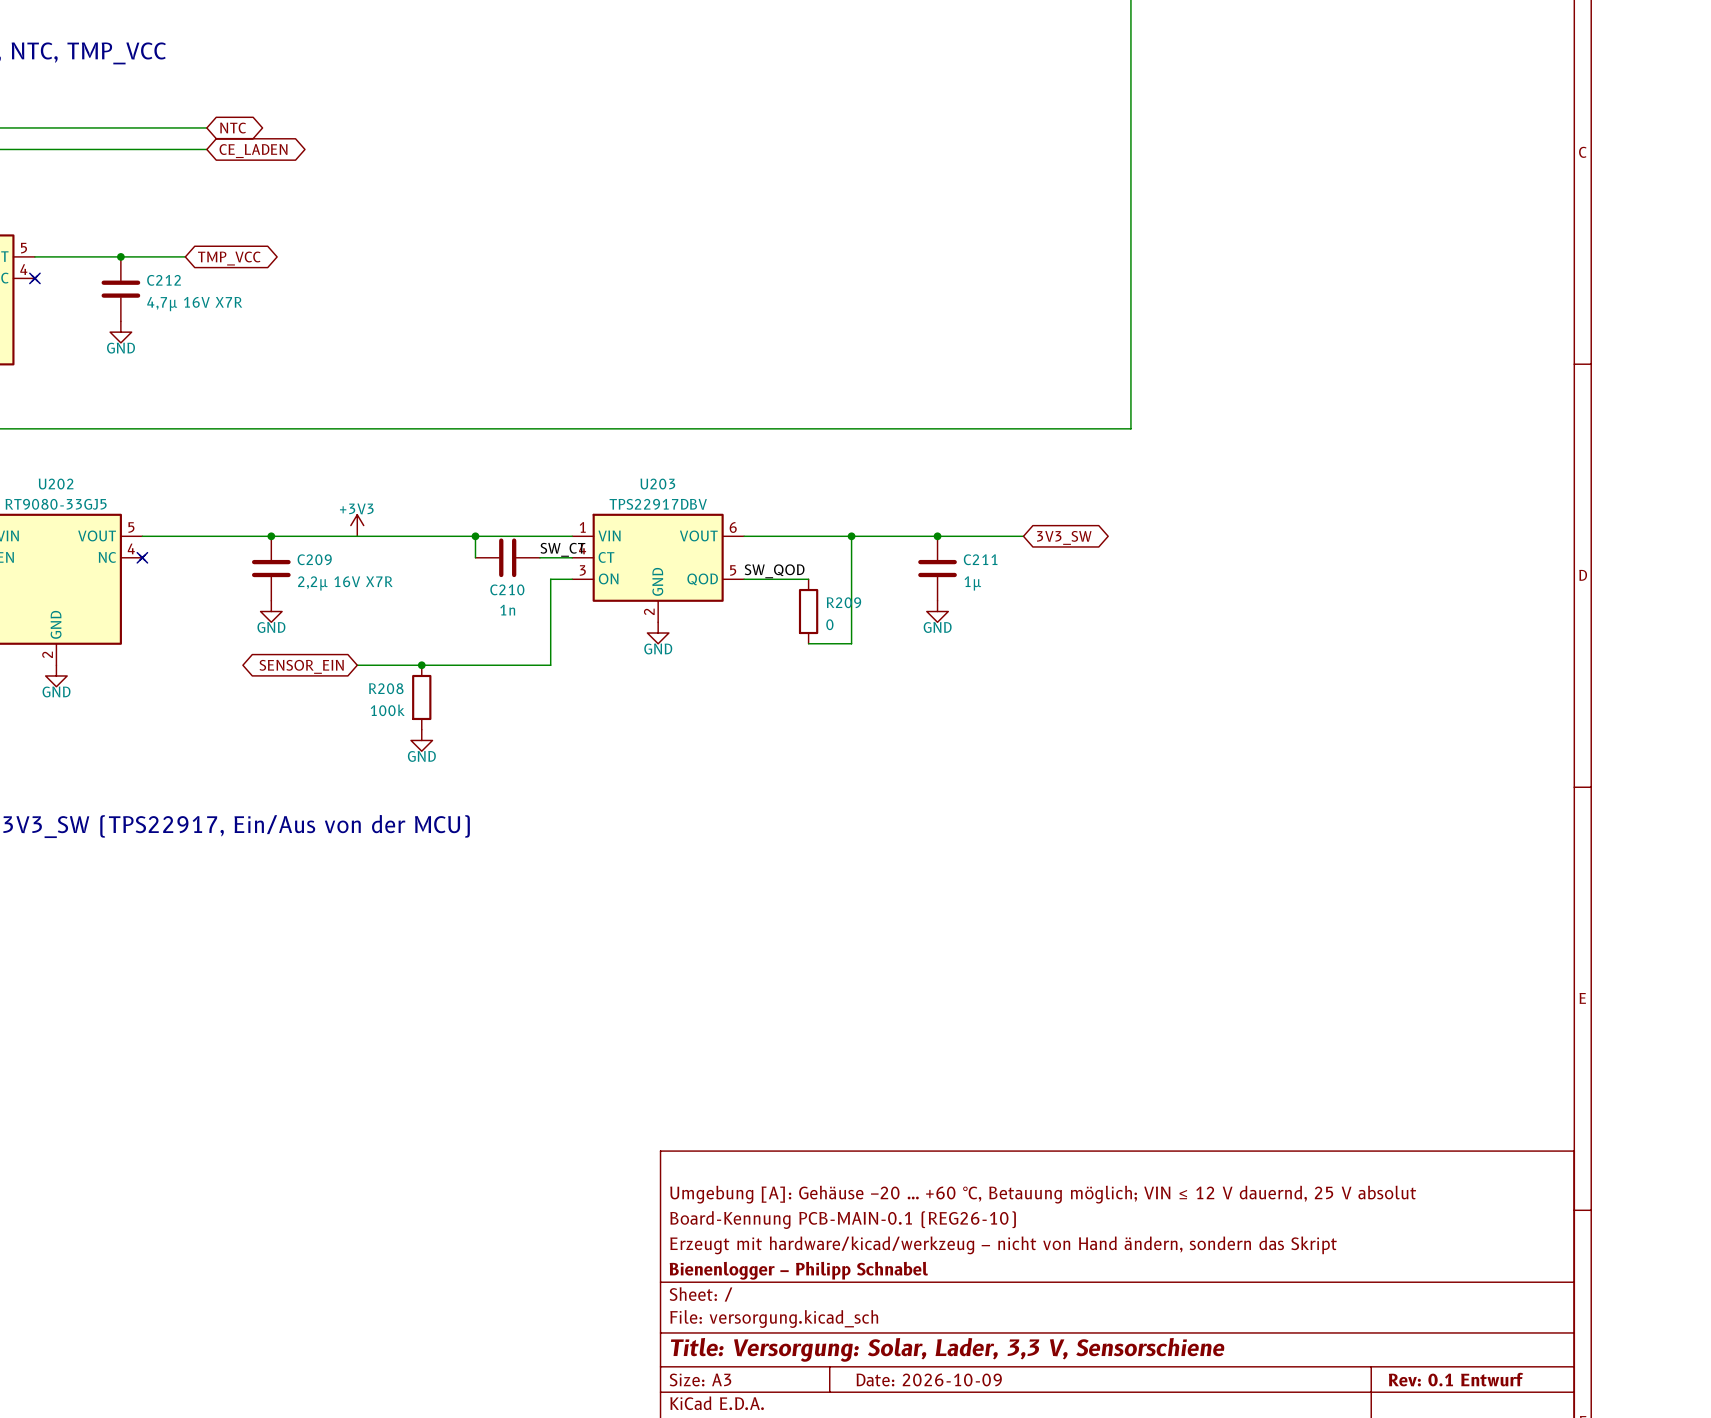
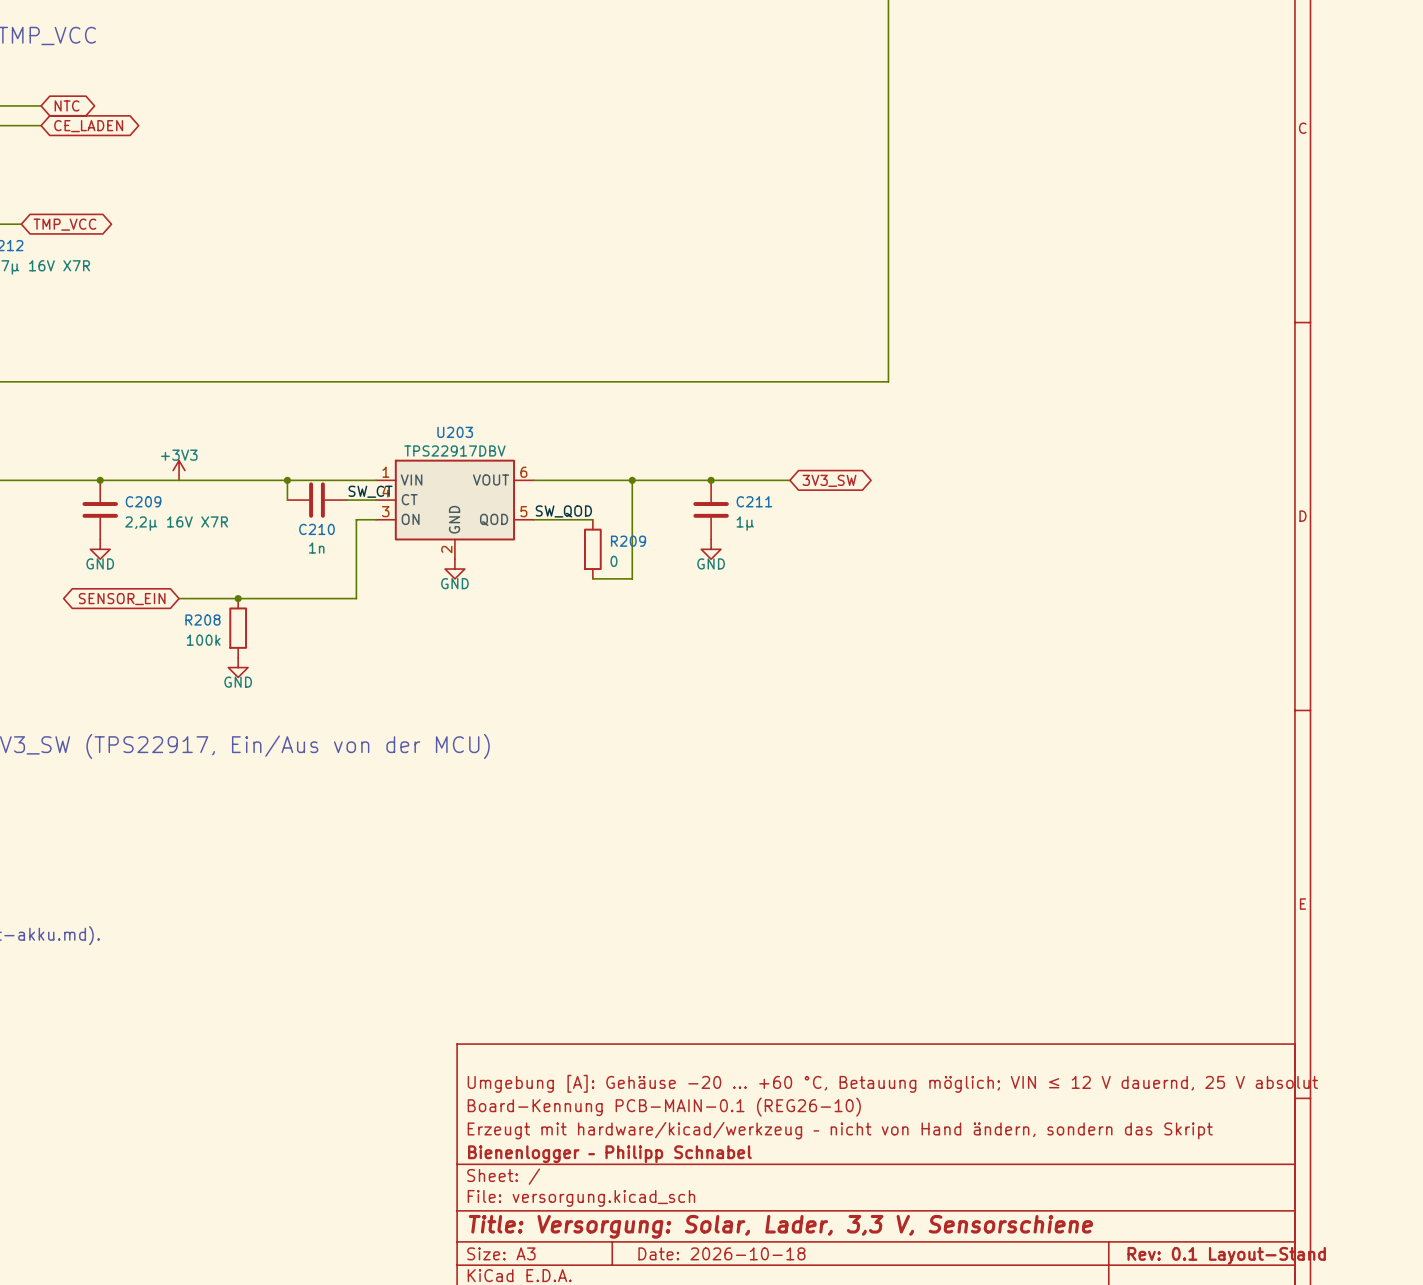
title block: Date: 2026-10-09 (929, 1379) -> Date: 2026-10-18 (721, 1253)
title block: Rev: 0.1 Entwurf (1456, 1379) -> Rev: 0.1 Layout-Stand (1226, 1255)

